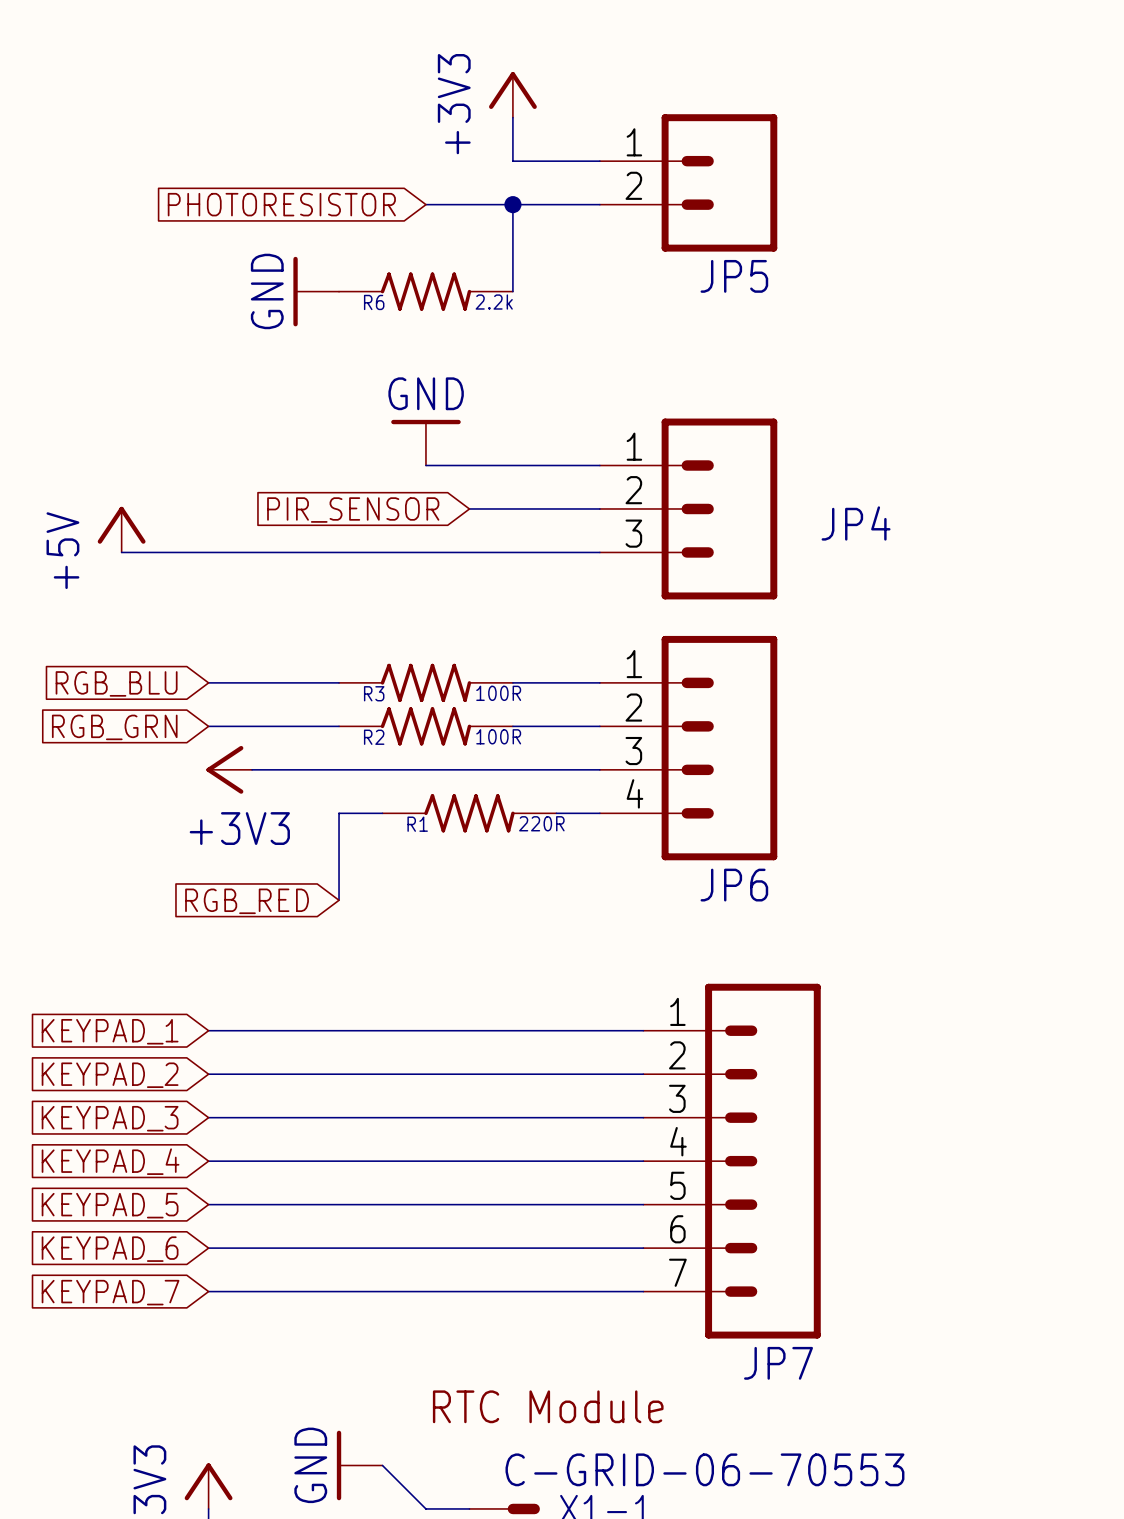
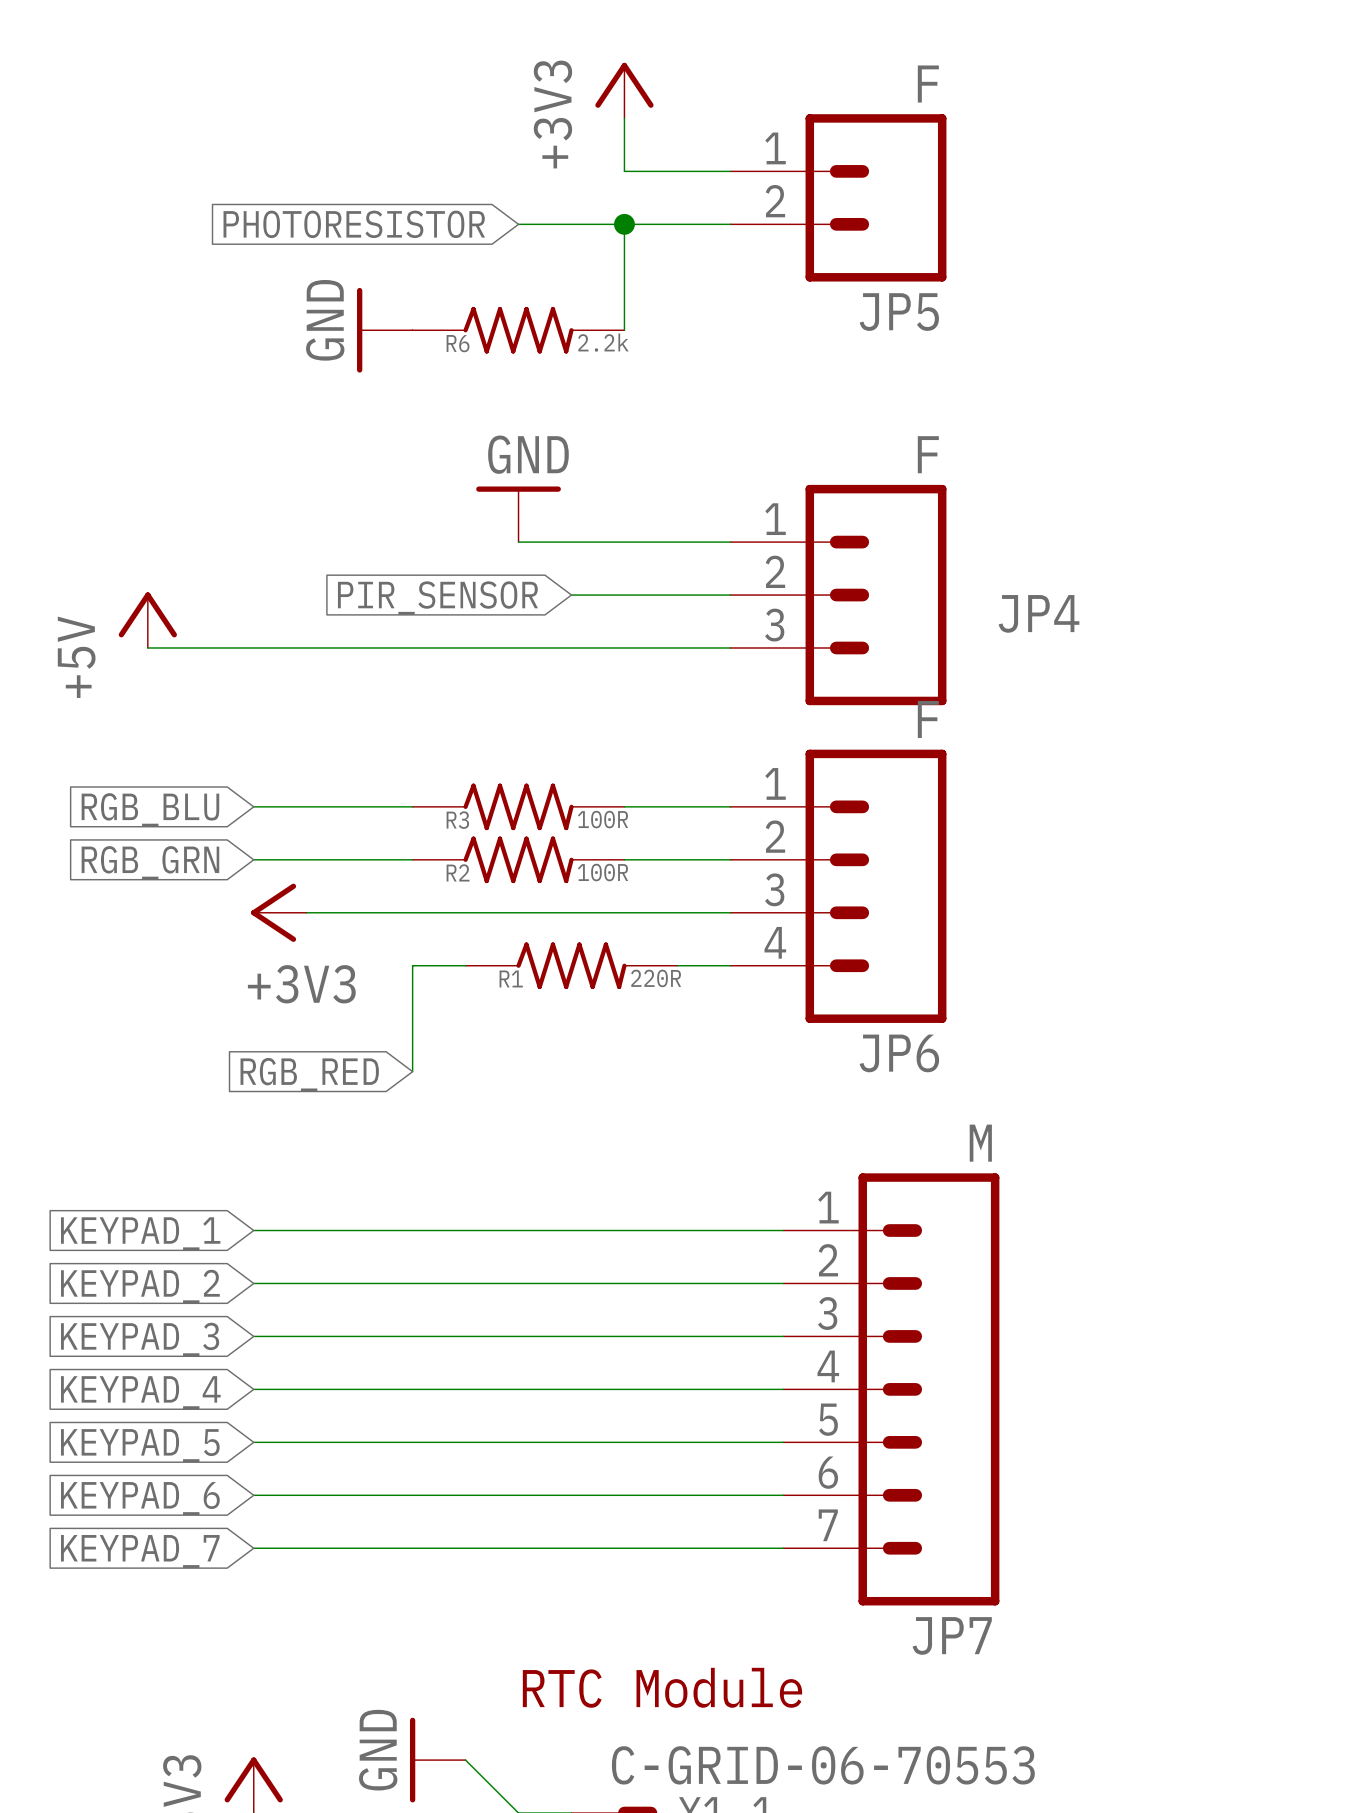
JP5 value: none -> F (928, 84)
JP4 value: none -> F (928, 454)
JP6 value: none -> F (928, 719)
JP7 value: none -> M (980, 1143)

